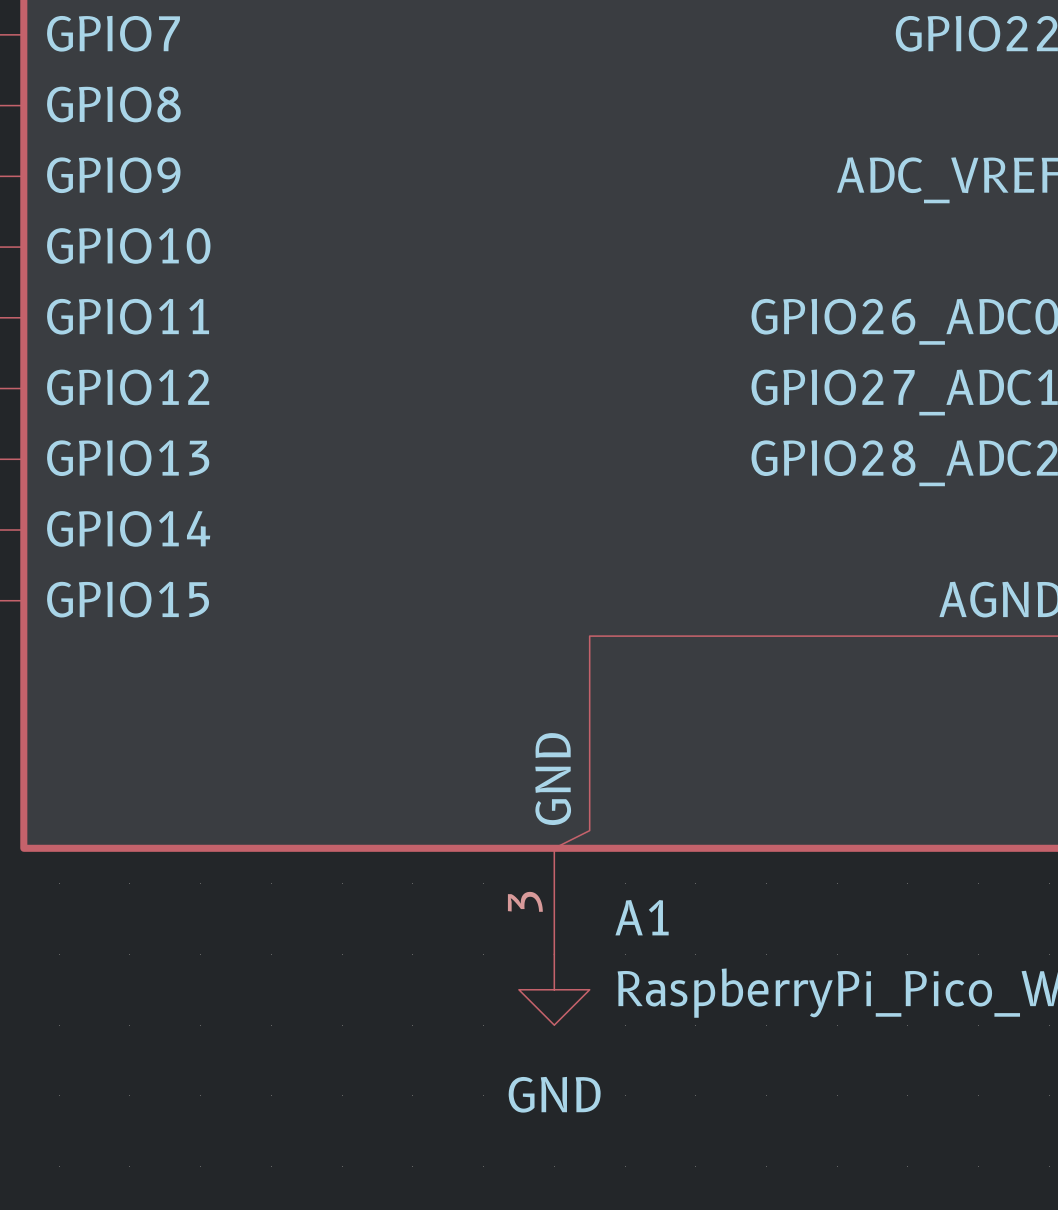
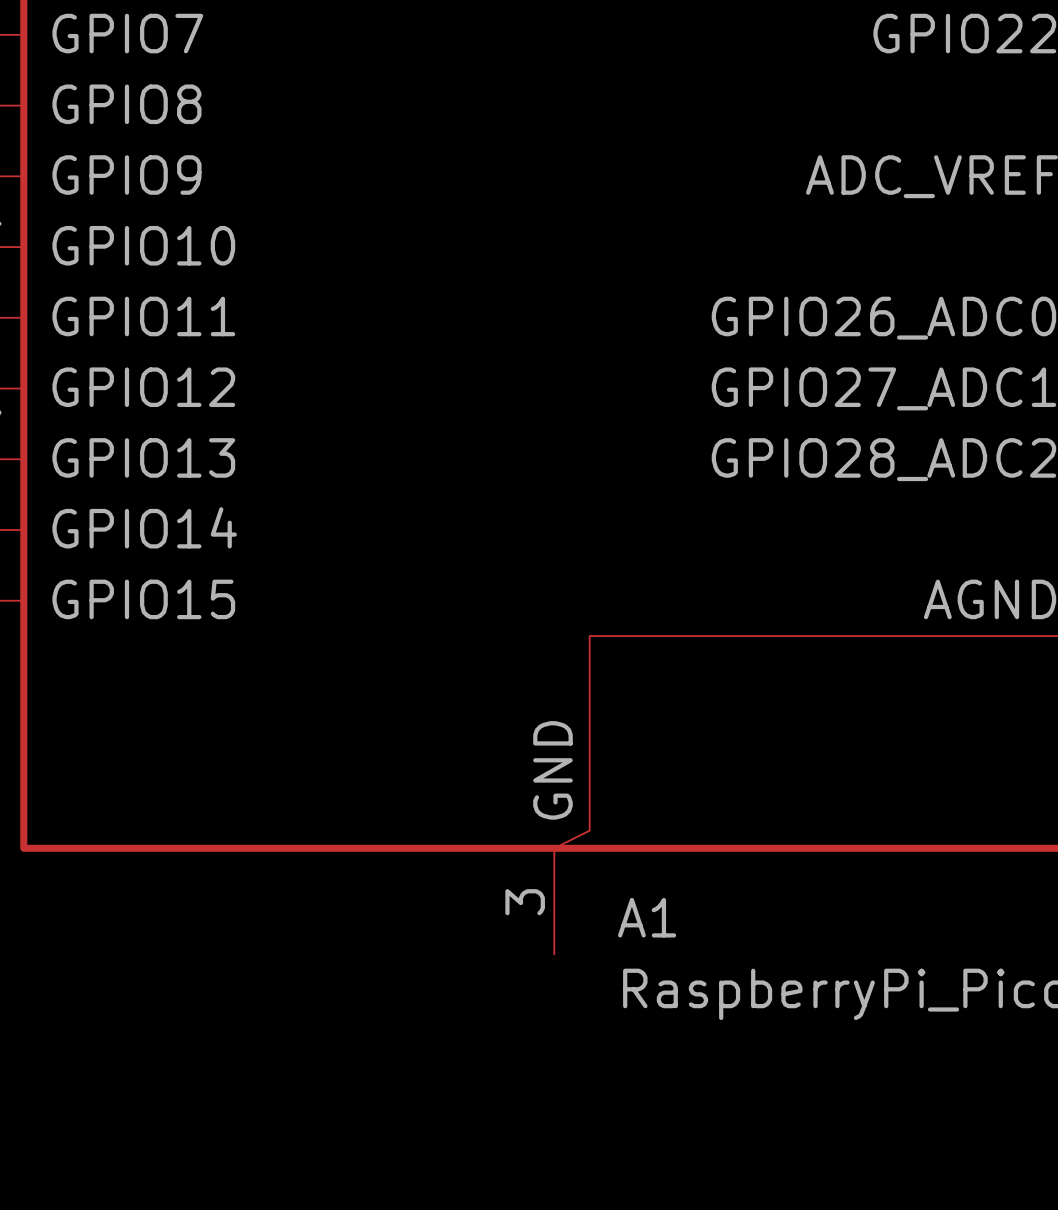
power symbol: GND (554, 989) -> none

